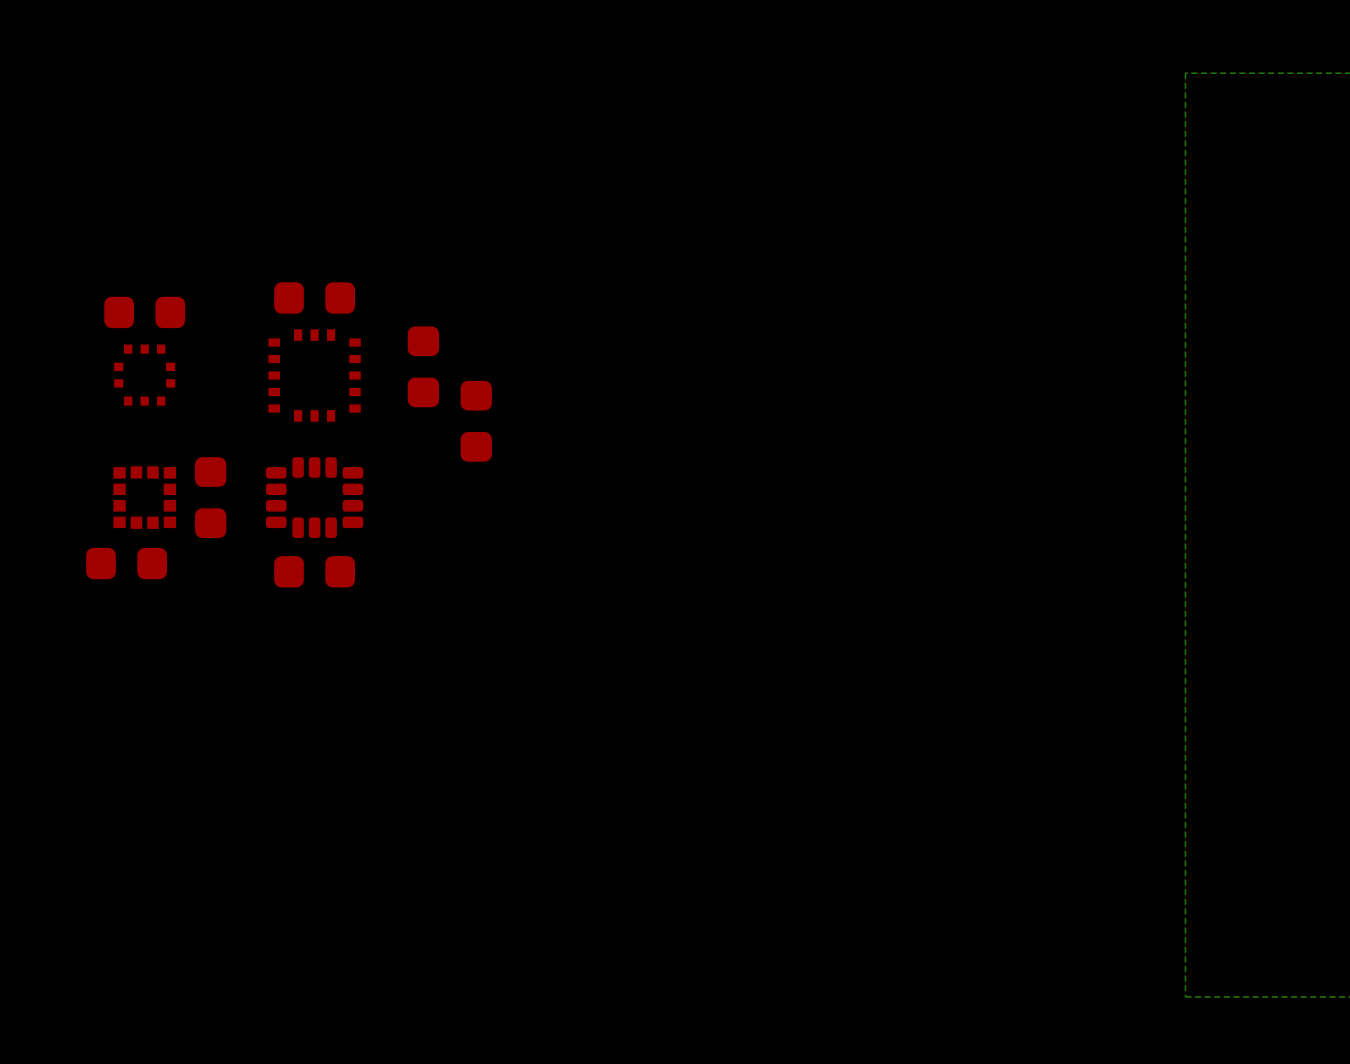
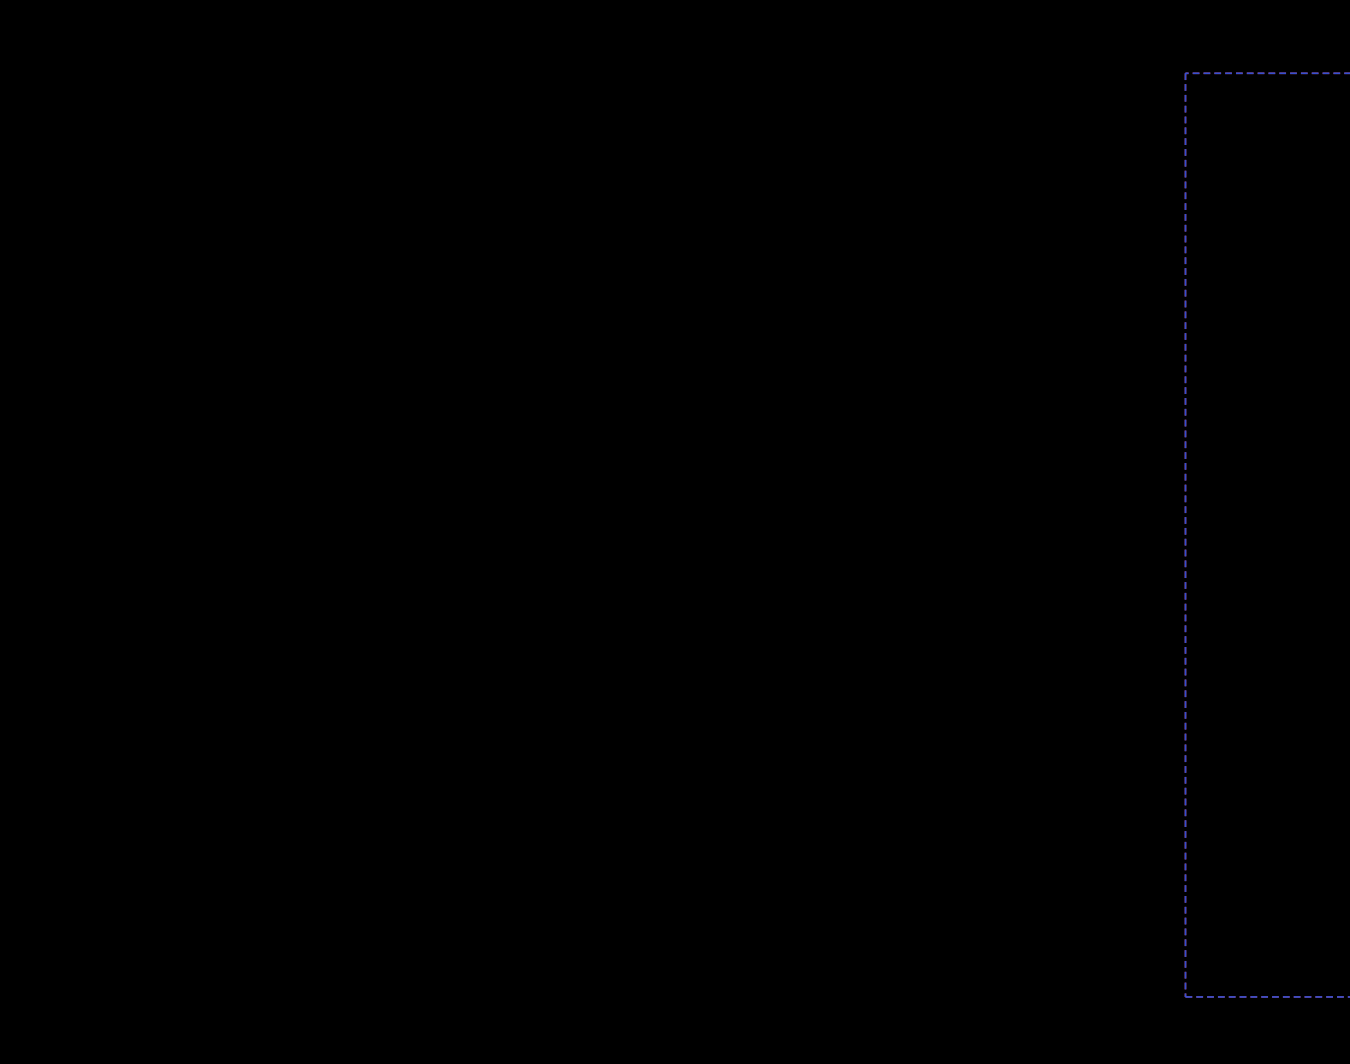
part: (314, 298) -> none
part: (144, 312) -> none
part: (423, 366) -> none
part: (144, 375) -> none
part: (314, 375) -> none
part: (476, 421) -> none
part: (144, 497) -> none
part: (210, 497) -> none
part: (314, 497) -> none
part: (126, 563) -> none
part: (314, 571) -> none

